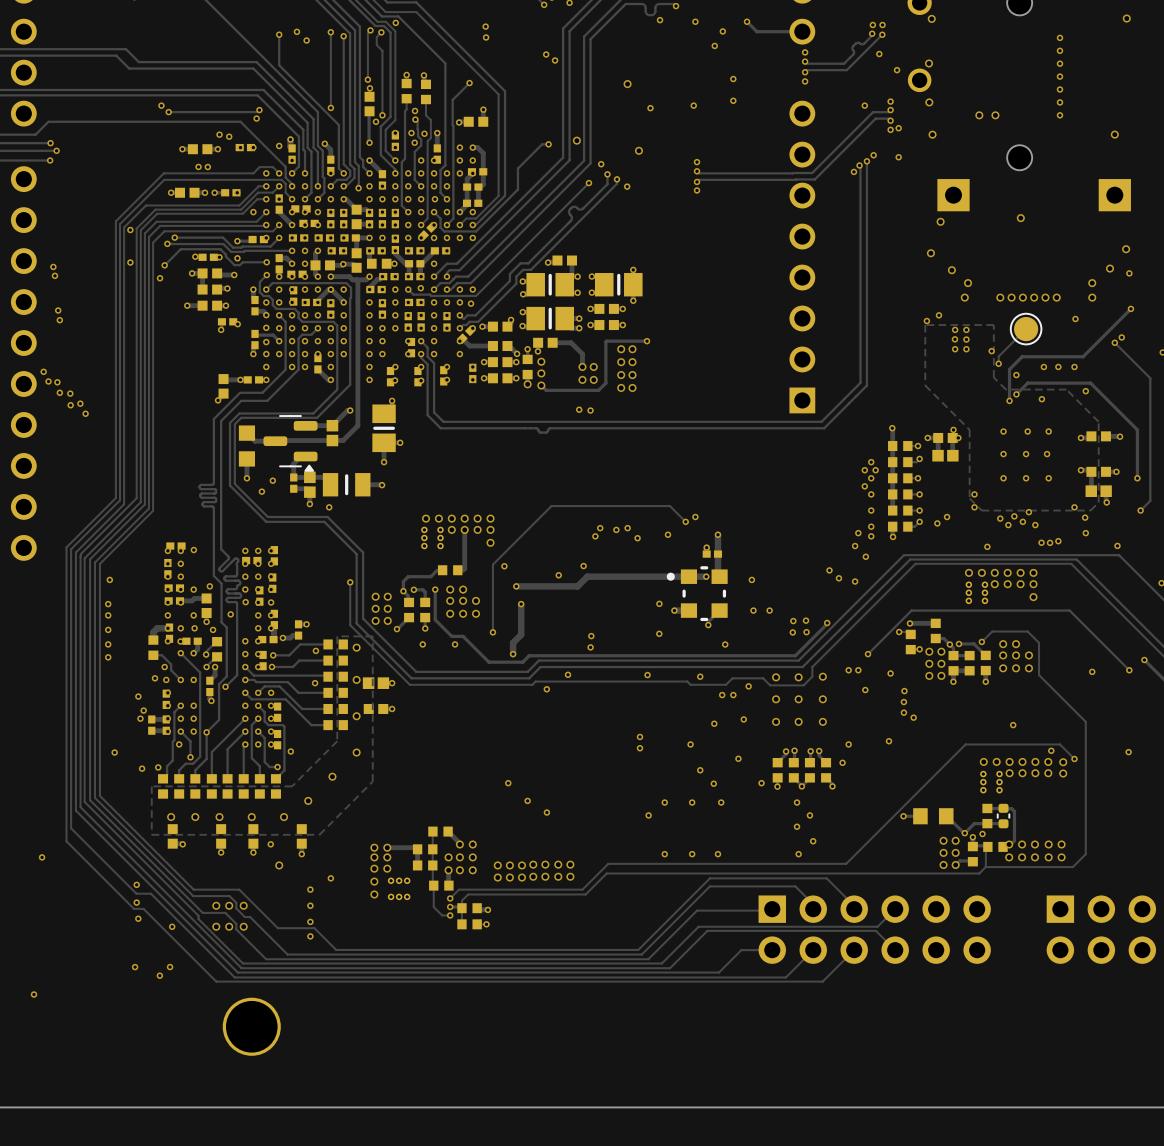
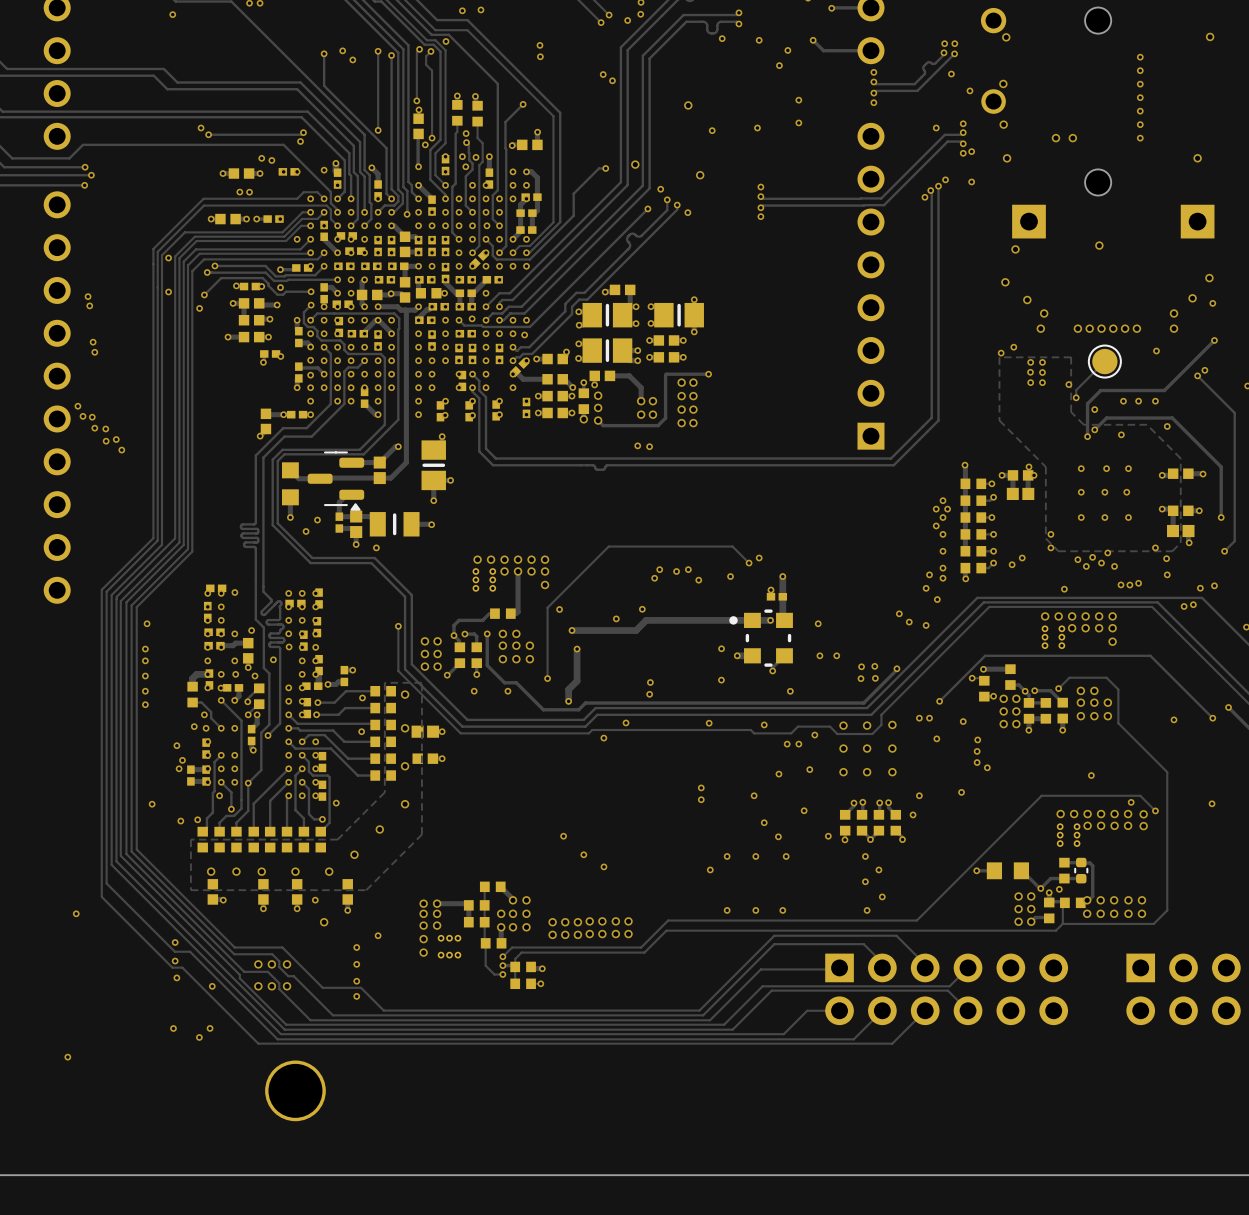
via: none -> (1214, 585)
via: none -> (1193, 604)
via: none -> (1184, 606)

